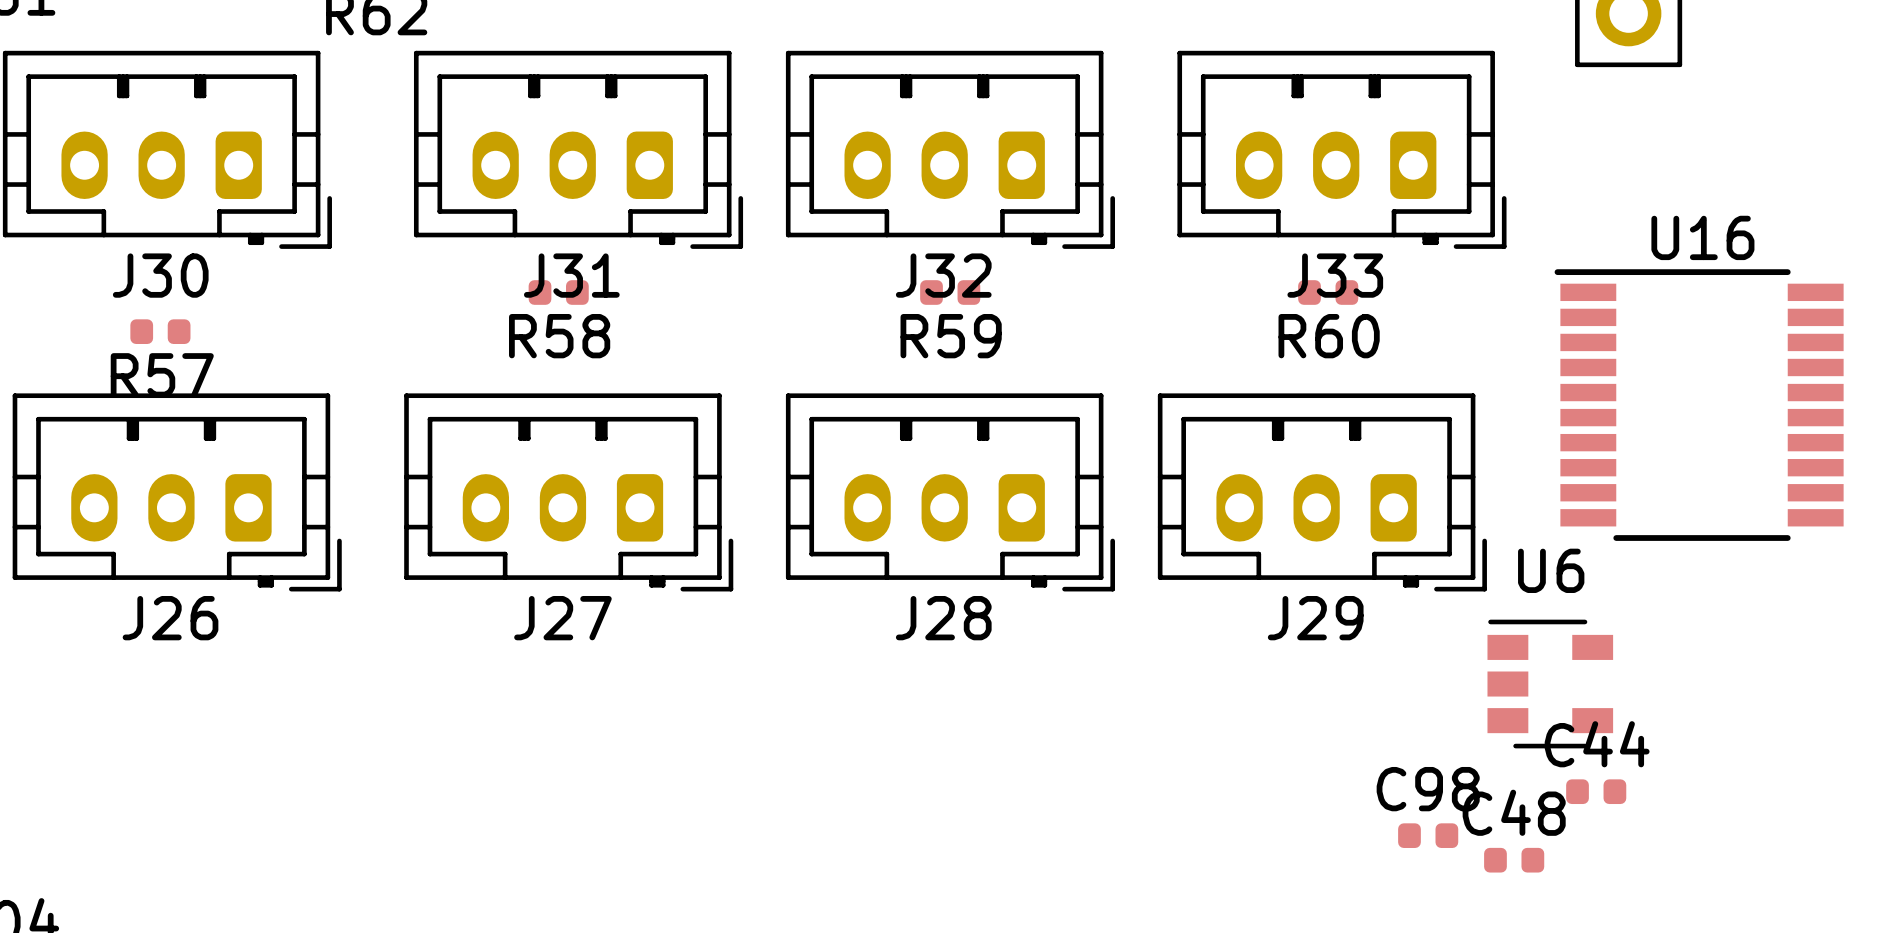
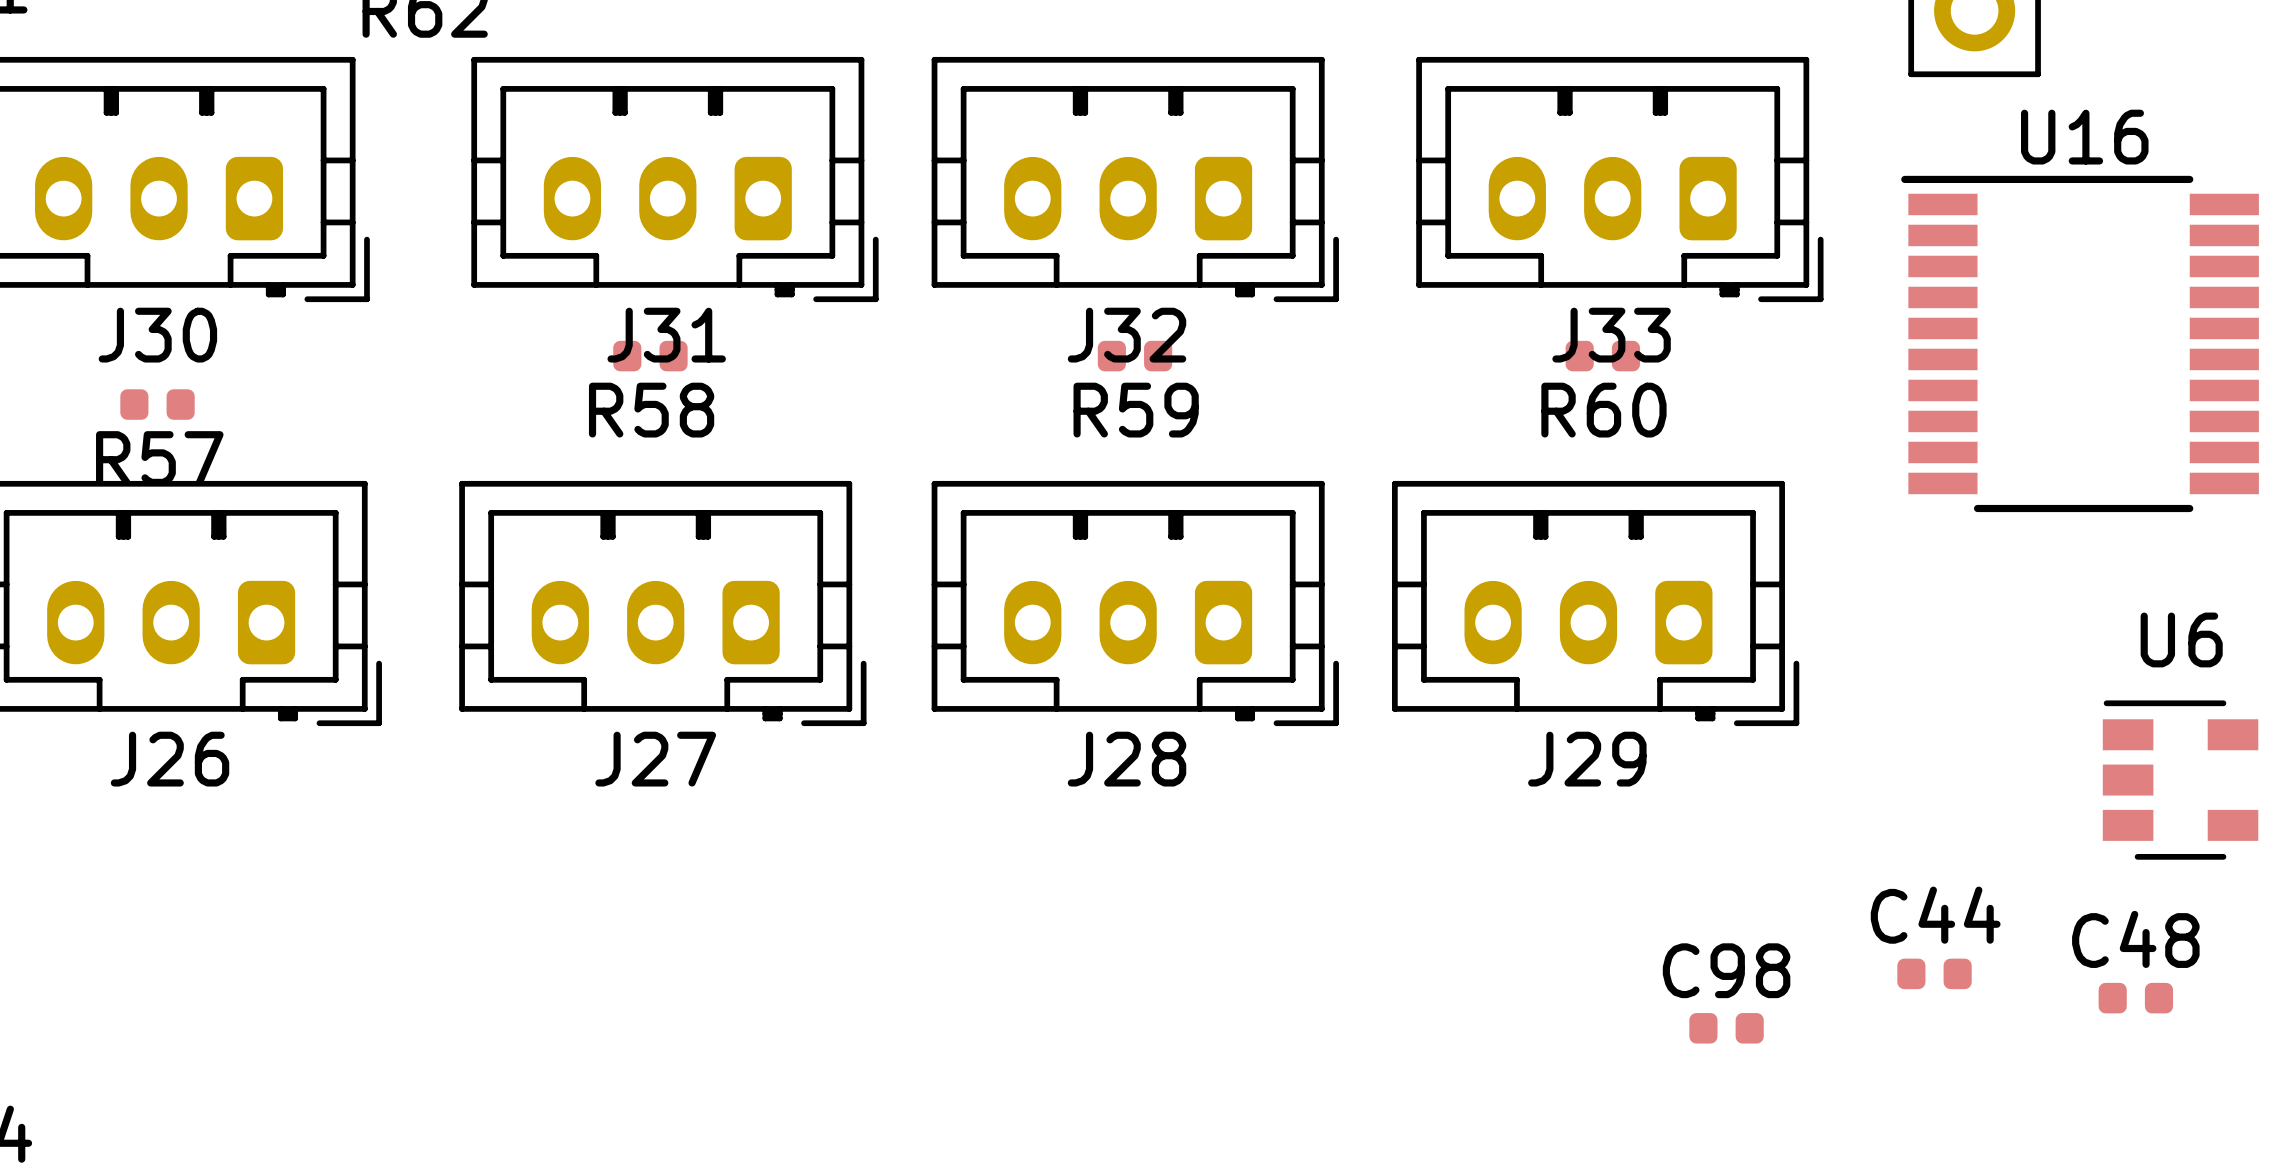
U16 position: (1699, 405) -> (2080, 343)
U6 position: (1550, 684) -> (2180, 780)
C48 position: (1514, 860) -> (2135, 998)

